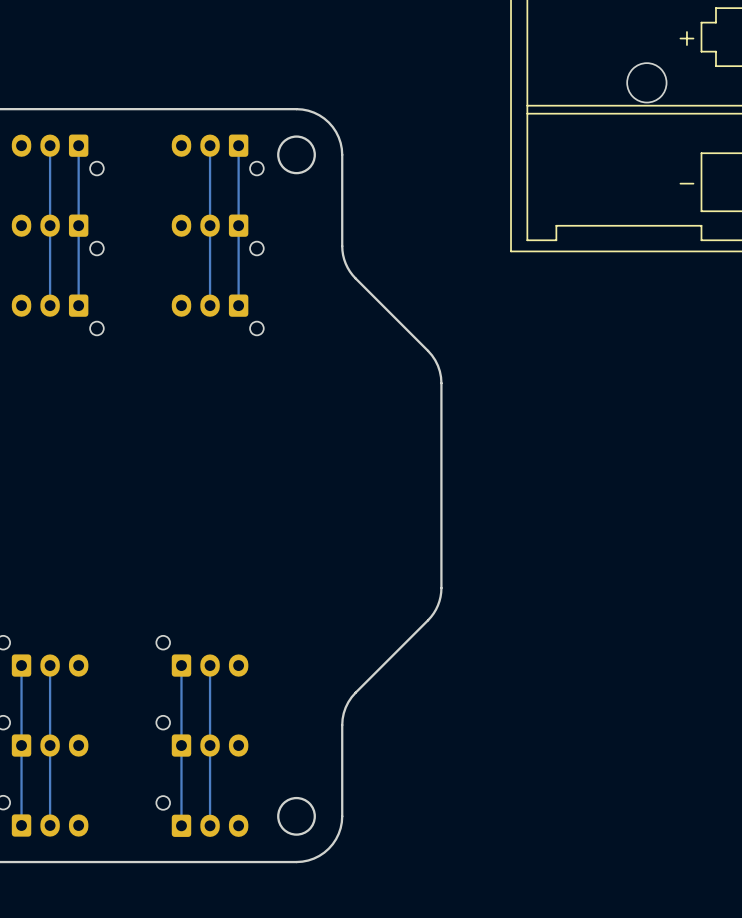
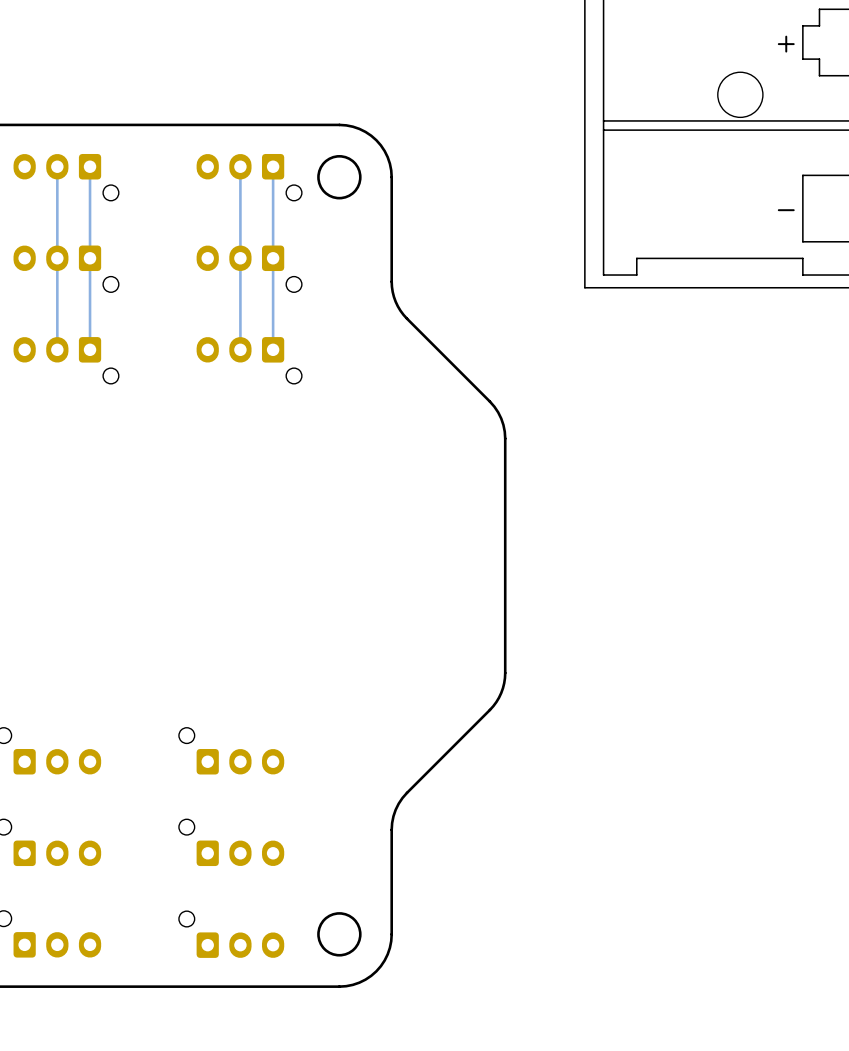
track: (21, 665) (21, 825) -> none
track: (50, 665) (50, 825) -> none
track: (181, 665) (181, 825) -> none
track: (210, 665) (210, 825) -> none

